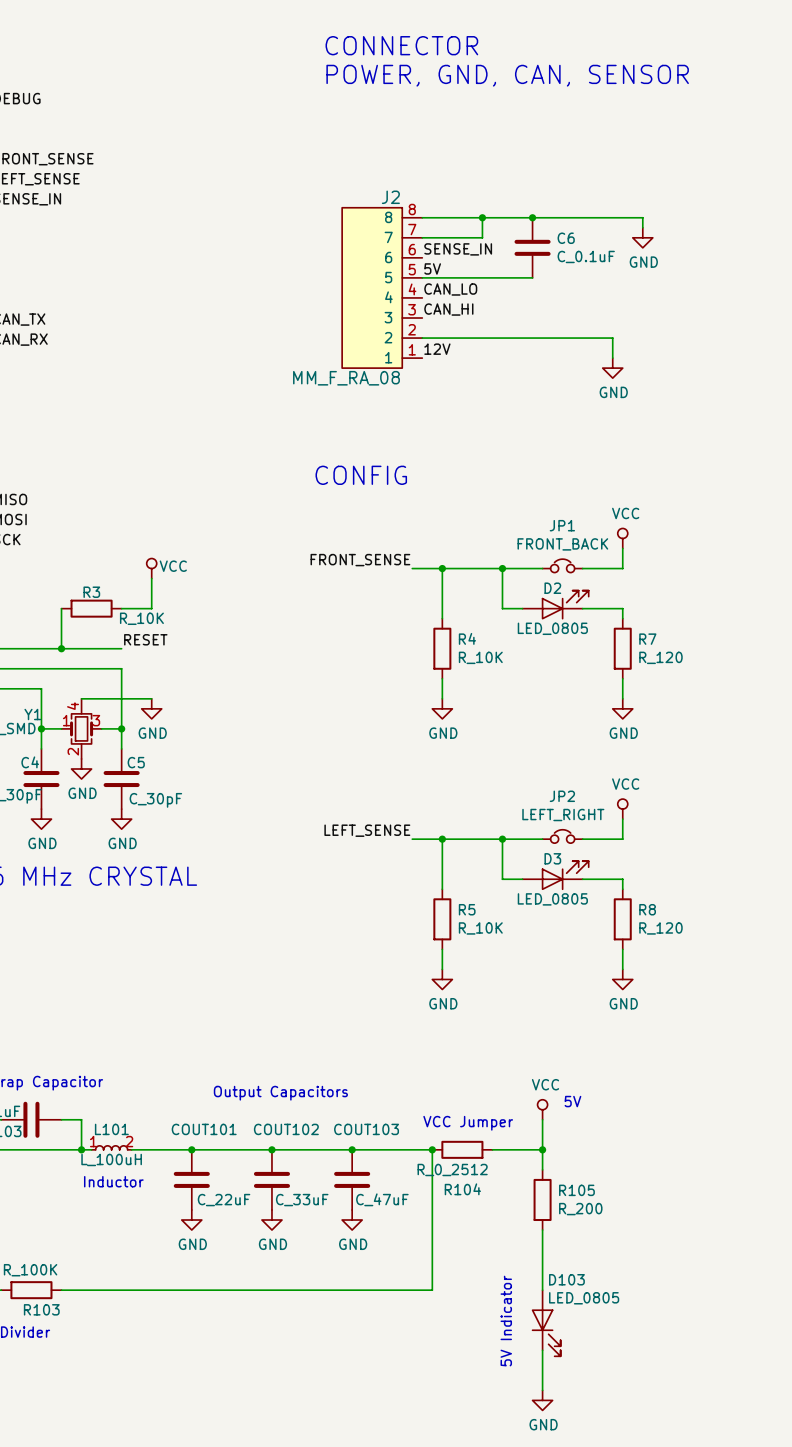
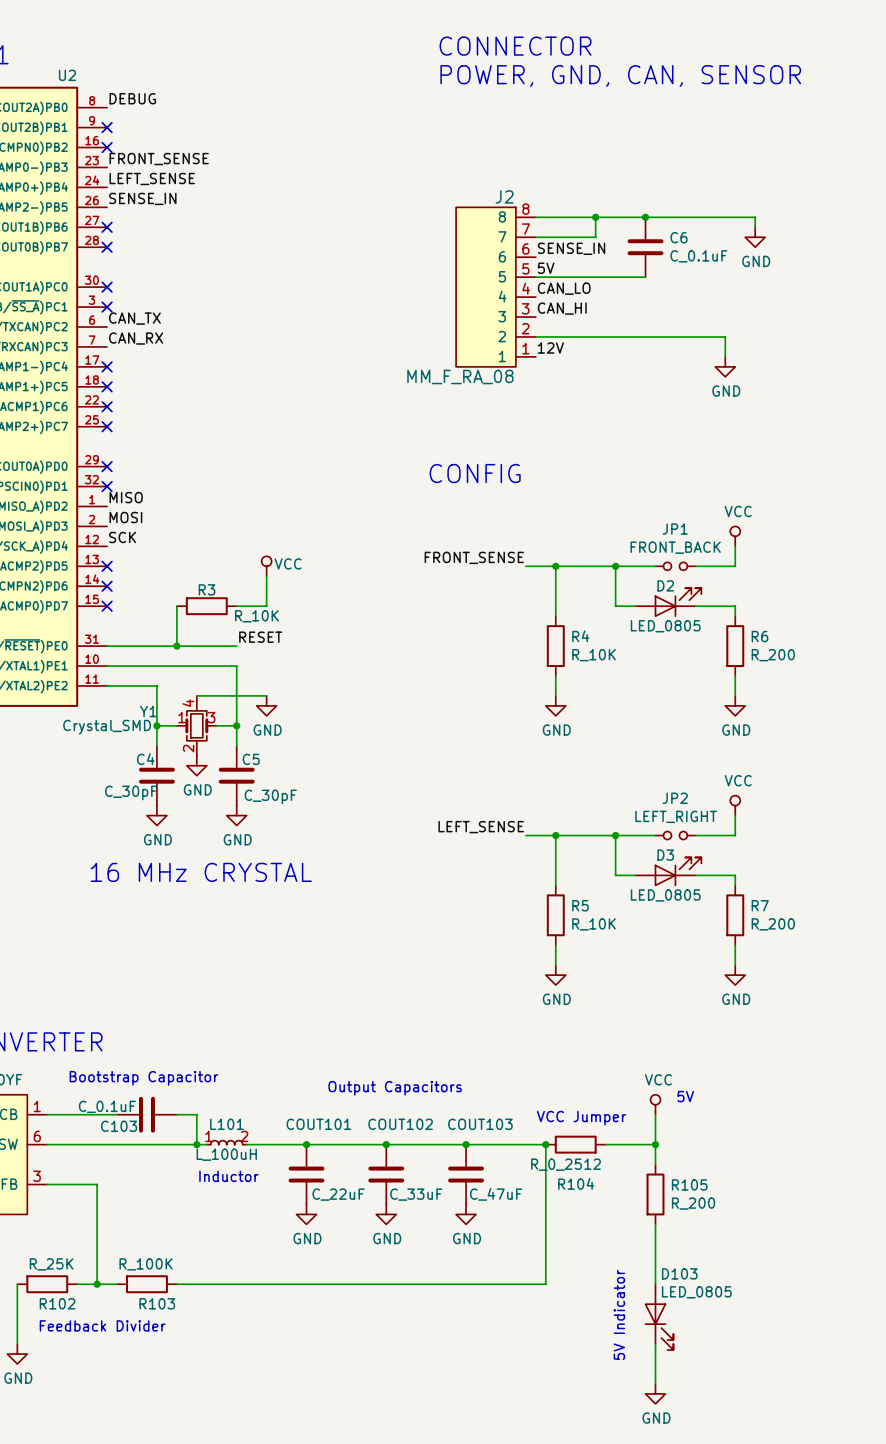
JP1 symbol: [542, 559, 583, 573] -> [655, 562, 696, 571]
R7 name: R7 (647, 639) -> R6 (759, 636)
R7 value: R_120 (660, 657) -> R_200 (773, 655)
JP2 symbol: [542, 829, 583, 844] -> [655, 831, 696, 840]
R8 name: R8 (647, 909) -> R7 (760, 905)
R8 value: R_120 (660, 928) -> R_200 (773, 924)

